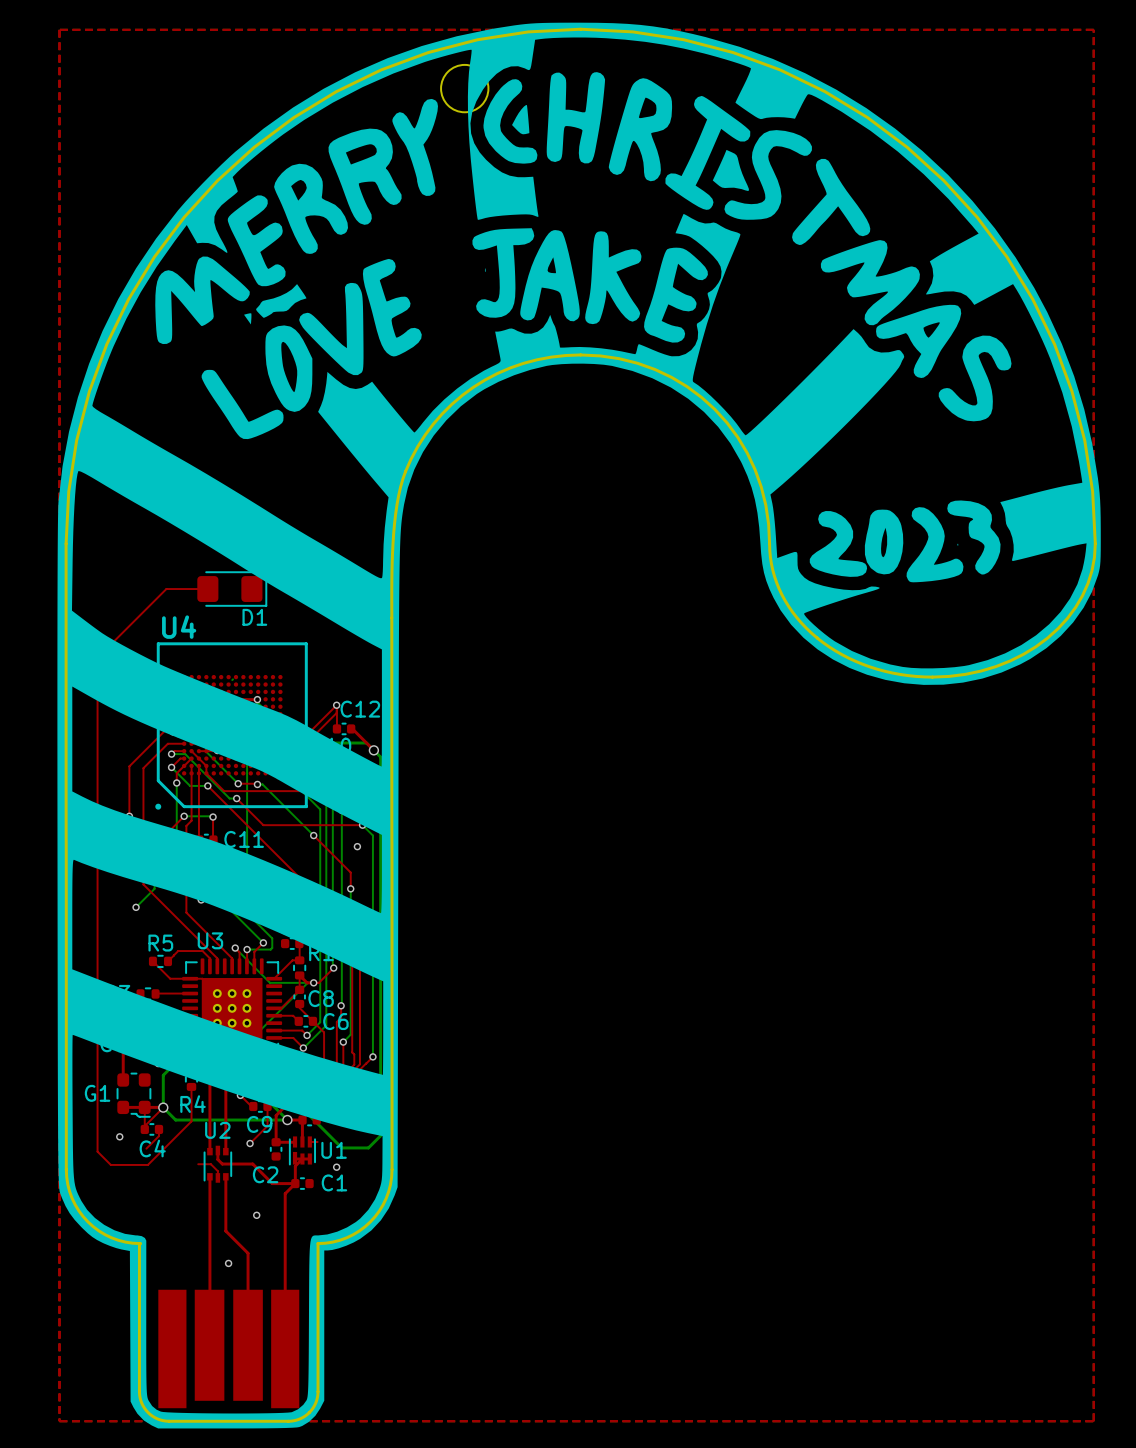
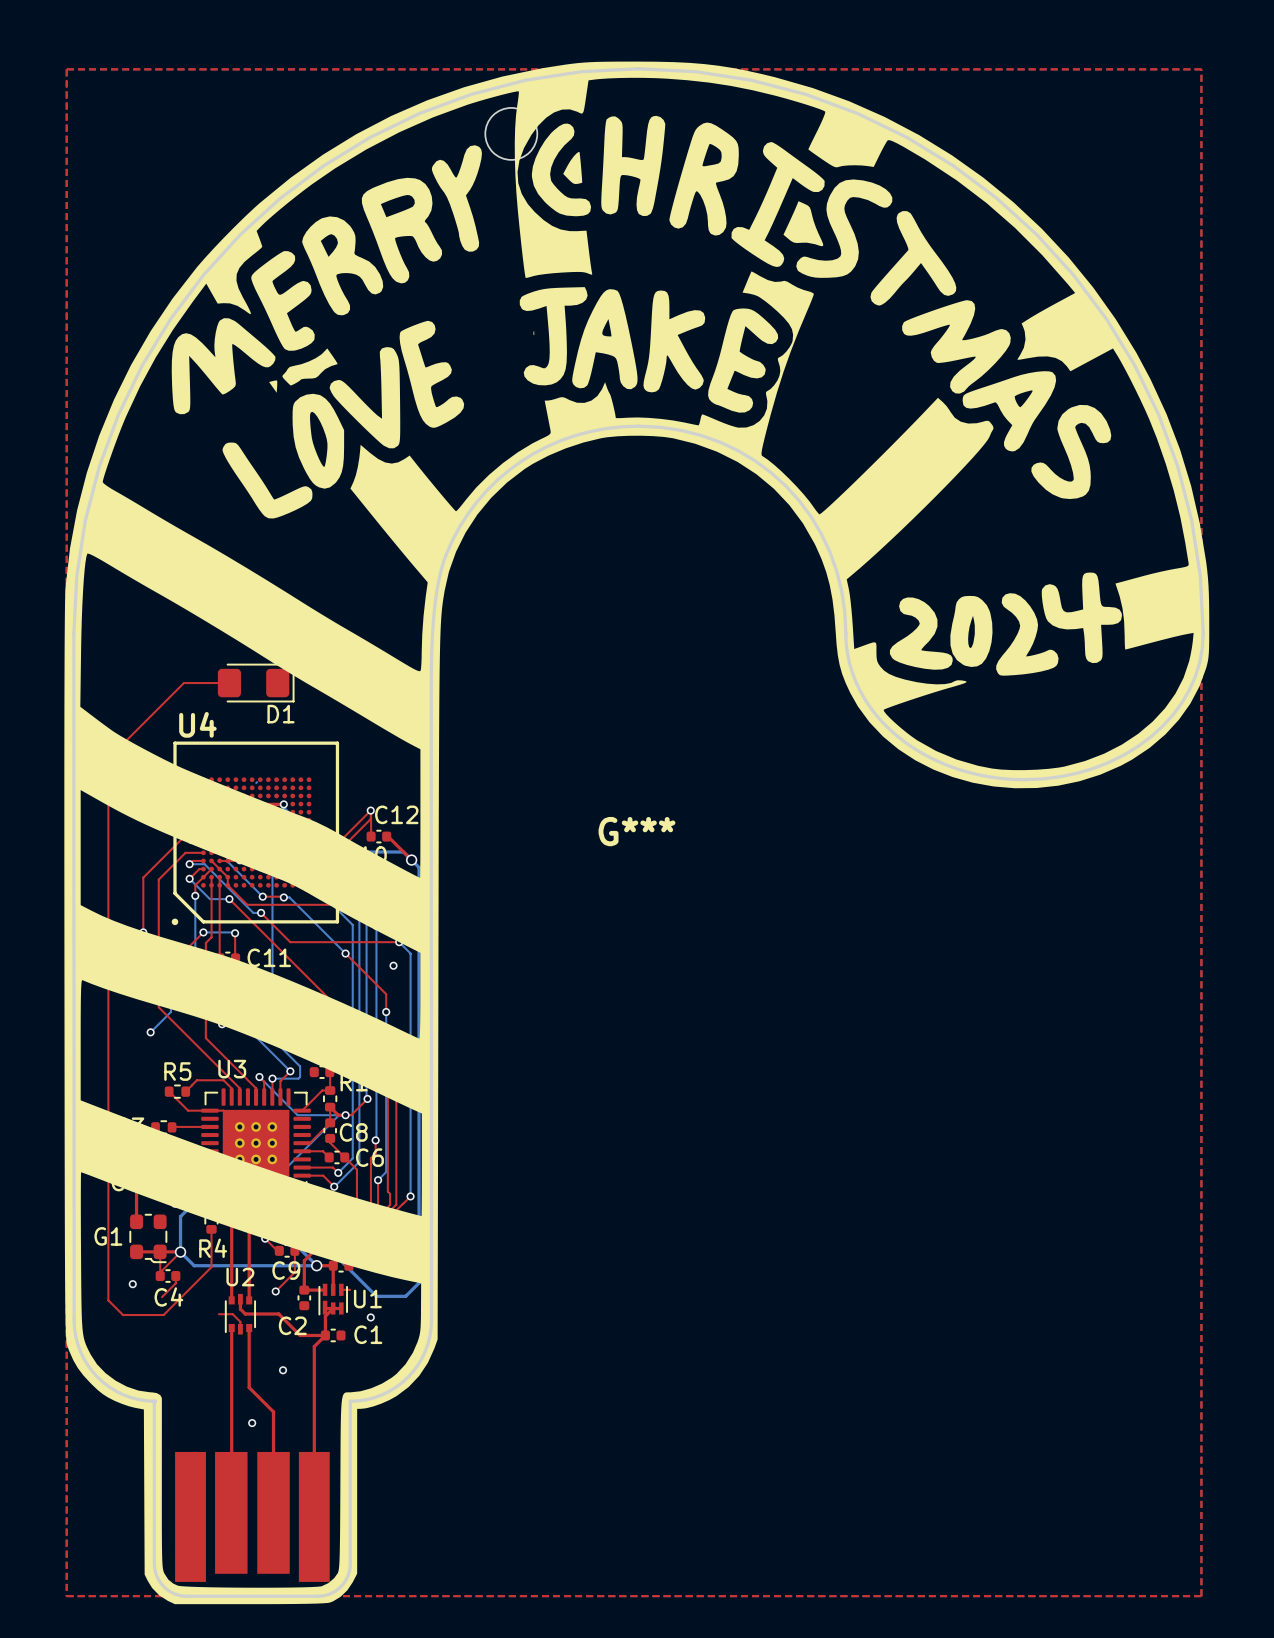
drawing: [57, 22, 1101, 1429] -> none
G***: none -> (636, 832)

